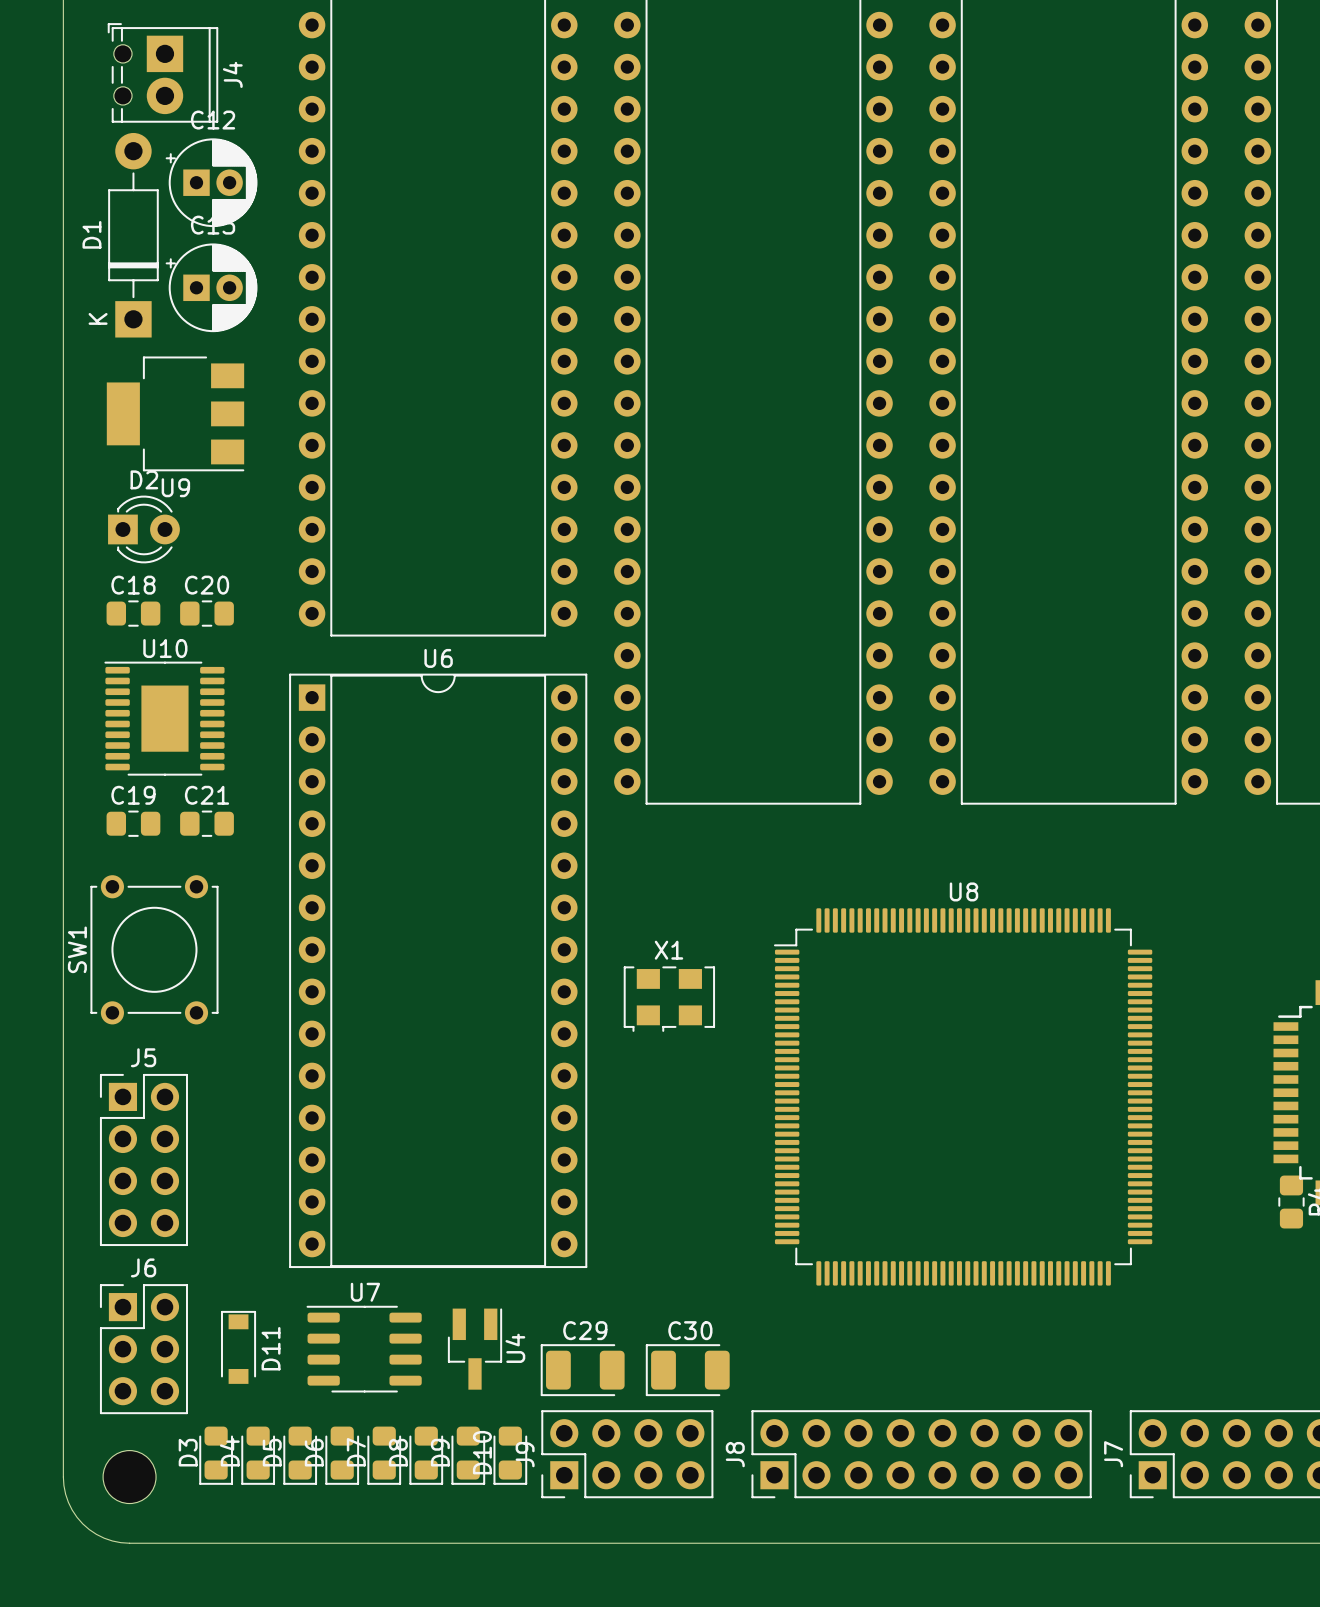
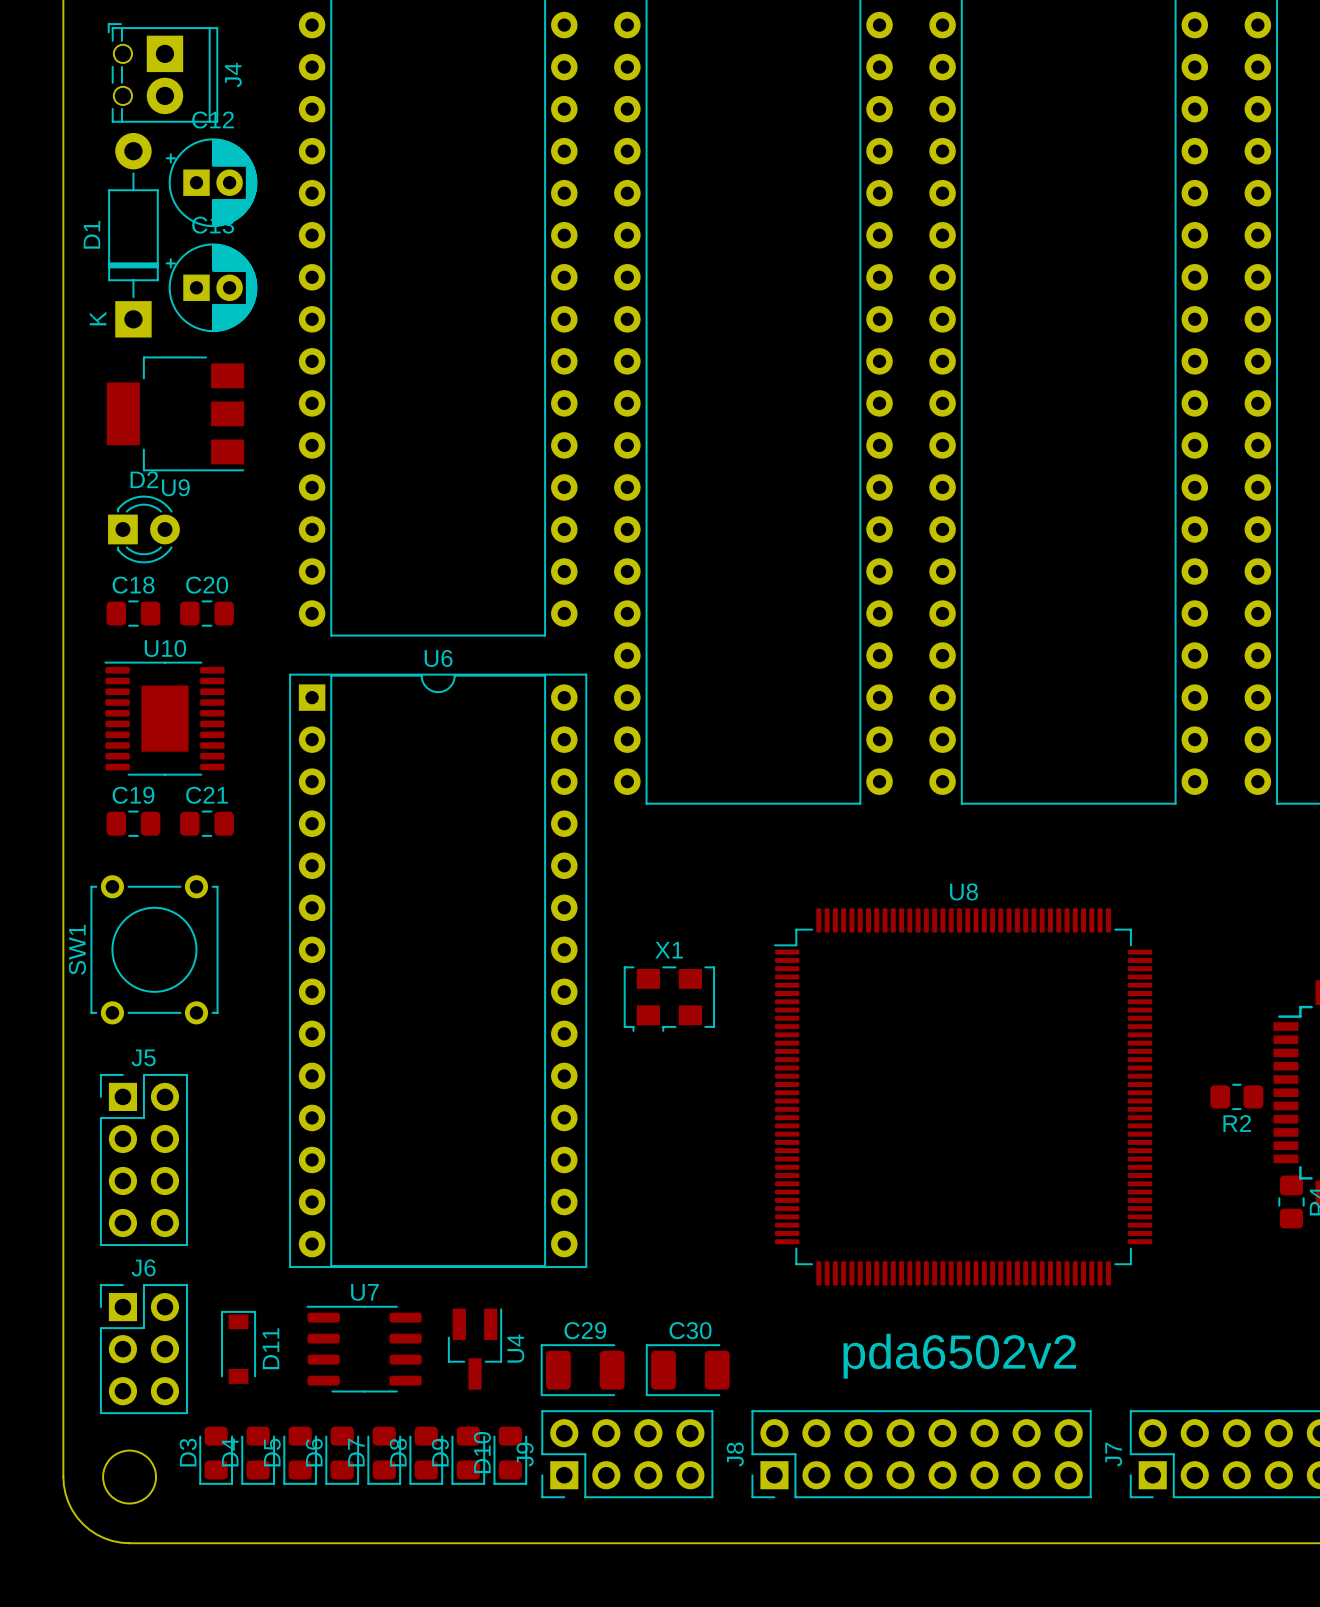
R2: none -> (1236, 1096)
text: none -> pda6502v2 (959, 1356)

